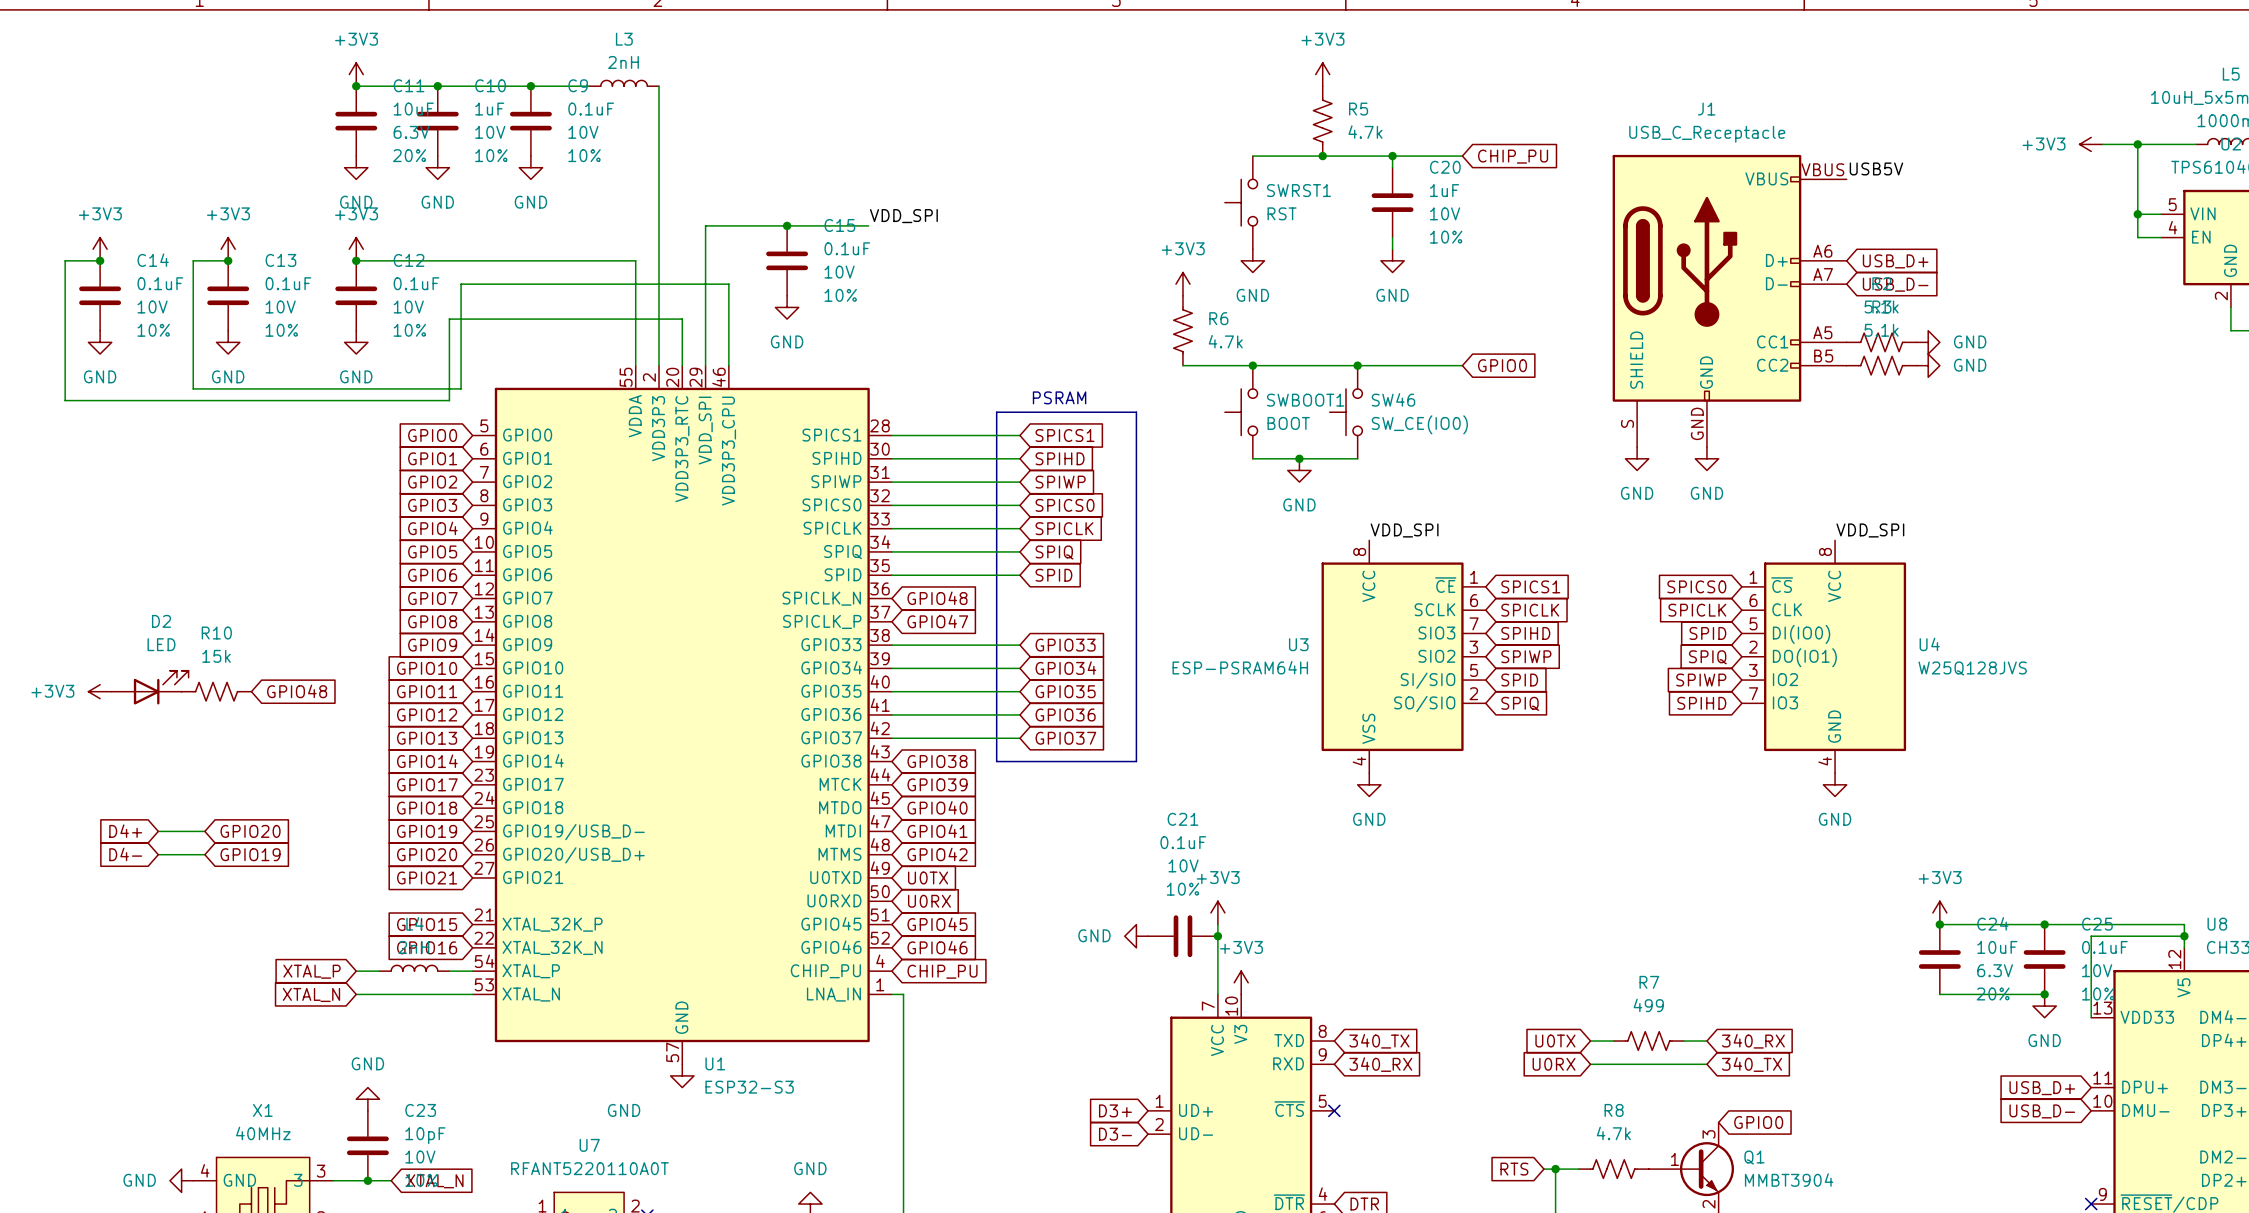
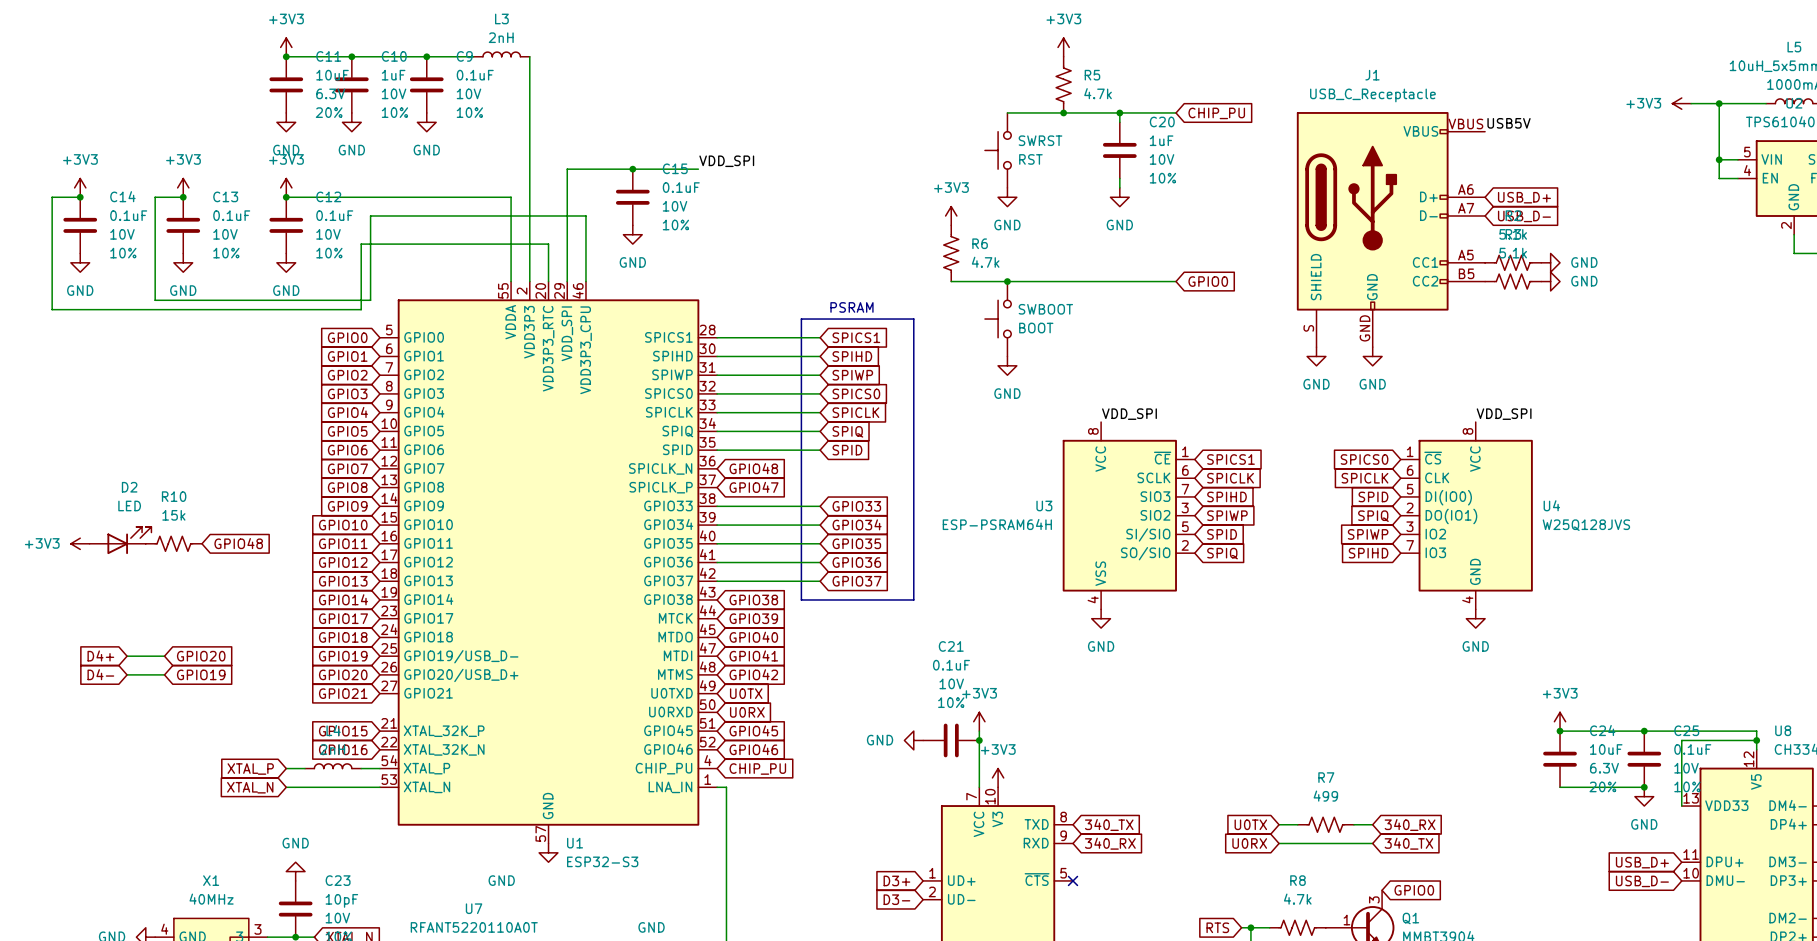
SWRST1 name: SWRST1 (1298, 190) -> SWRST (1040, 140)
junction: (1357, 365) -> none
SWBOOT1 name: SWBOOT1 (1305, 400) -> SWBOOT (1045, 309)
SW46: SW_CE(IO0) (1346, 412) -> none
wire: (1252, 458) (1357, 458) -> none
junction: (1299, 458) -> none
power symbol position: GND (1299, 470) -> GND (1007, 365)

